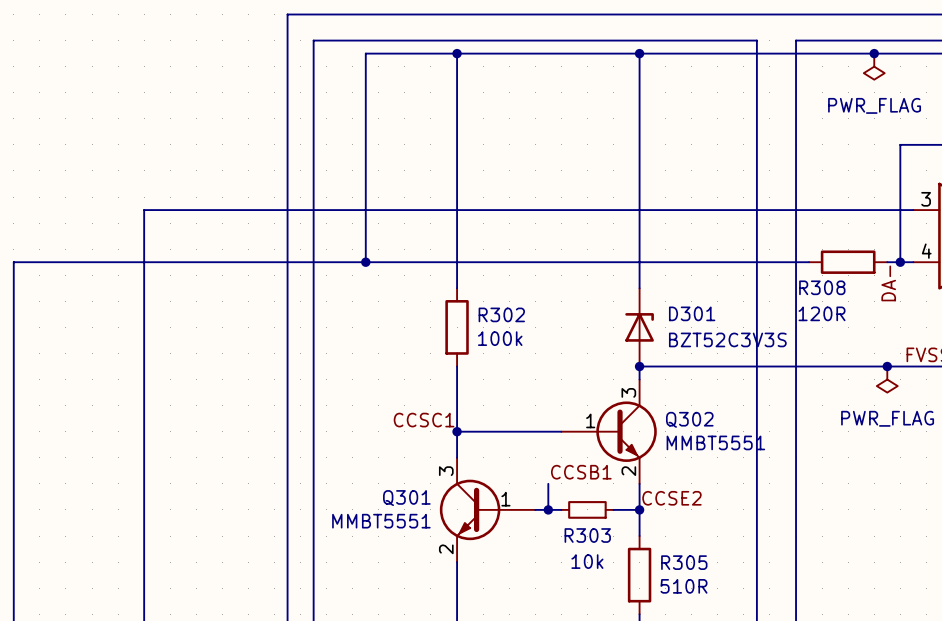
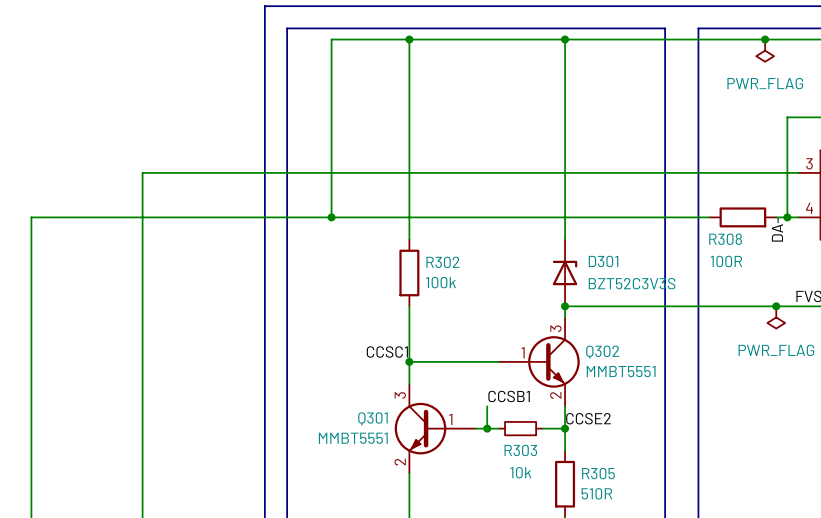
R308 value: 120R (822, 313) -> 100R (726, 261)

